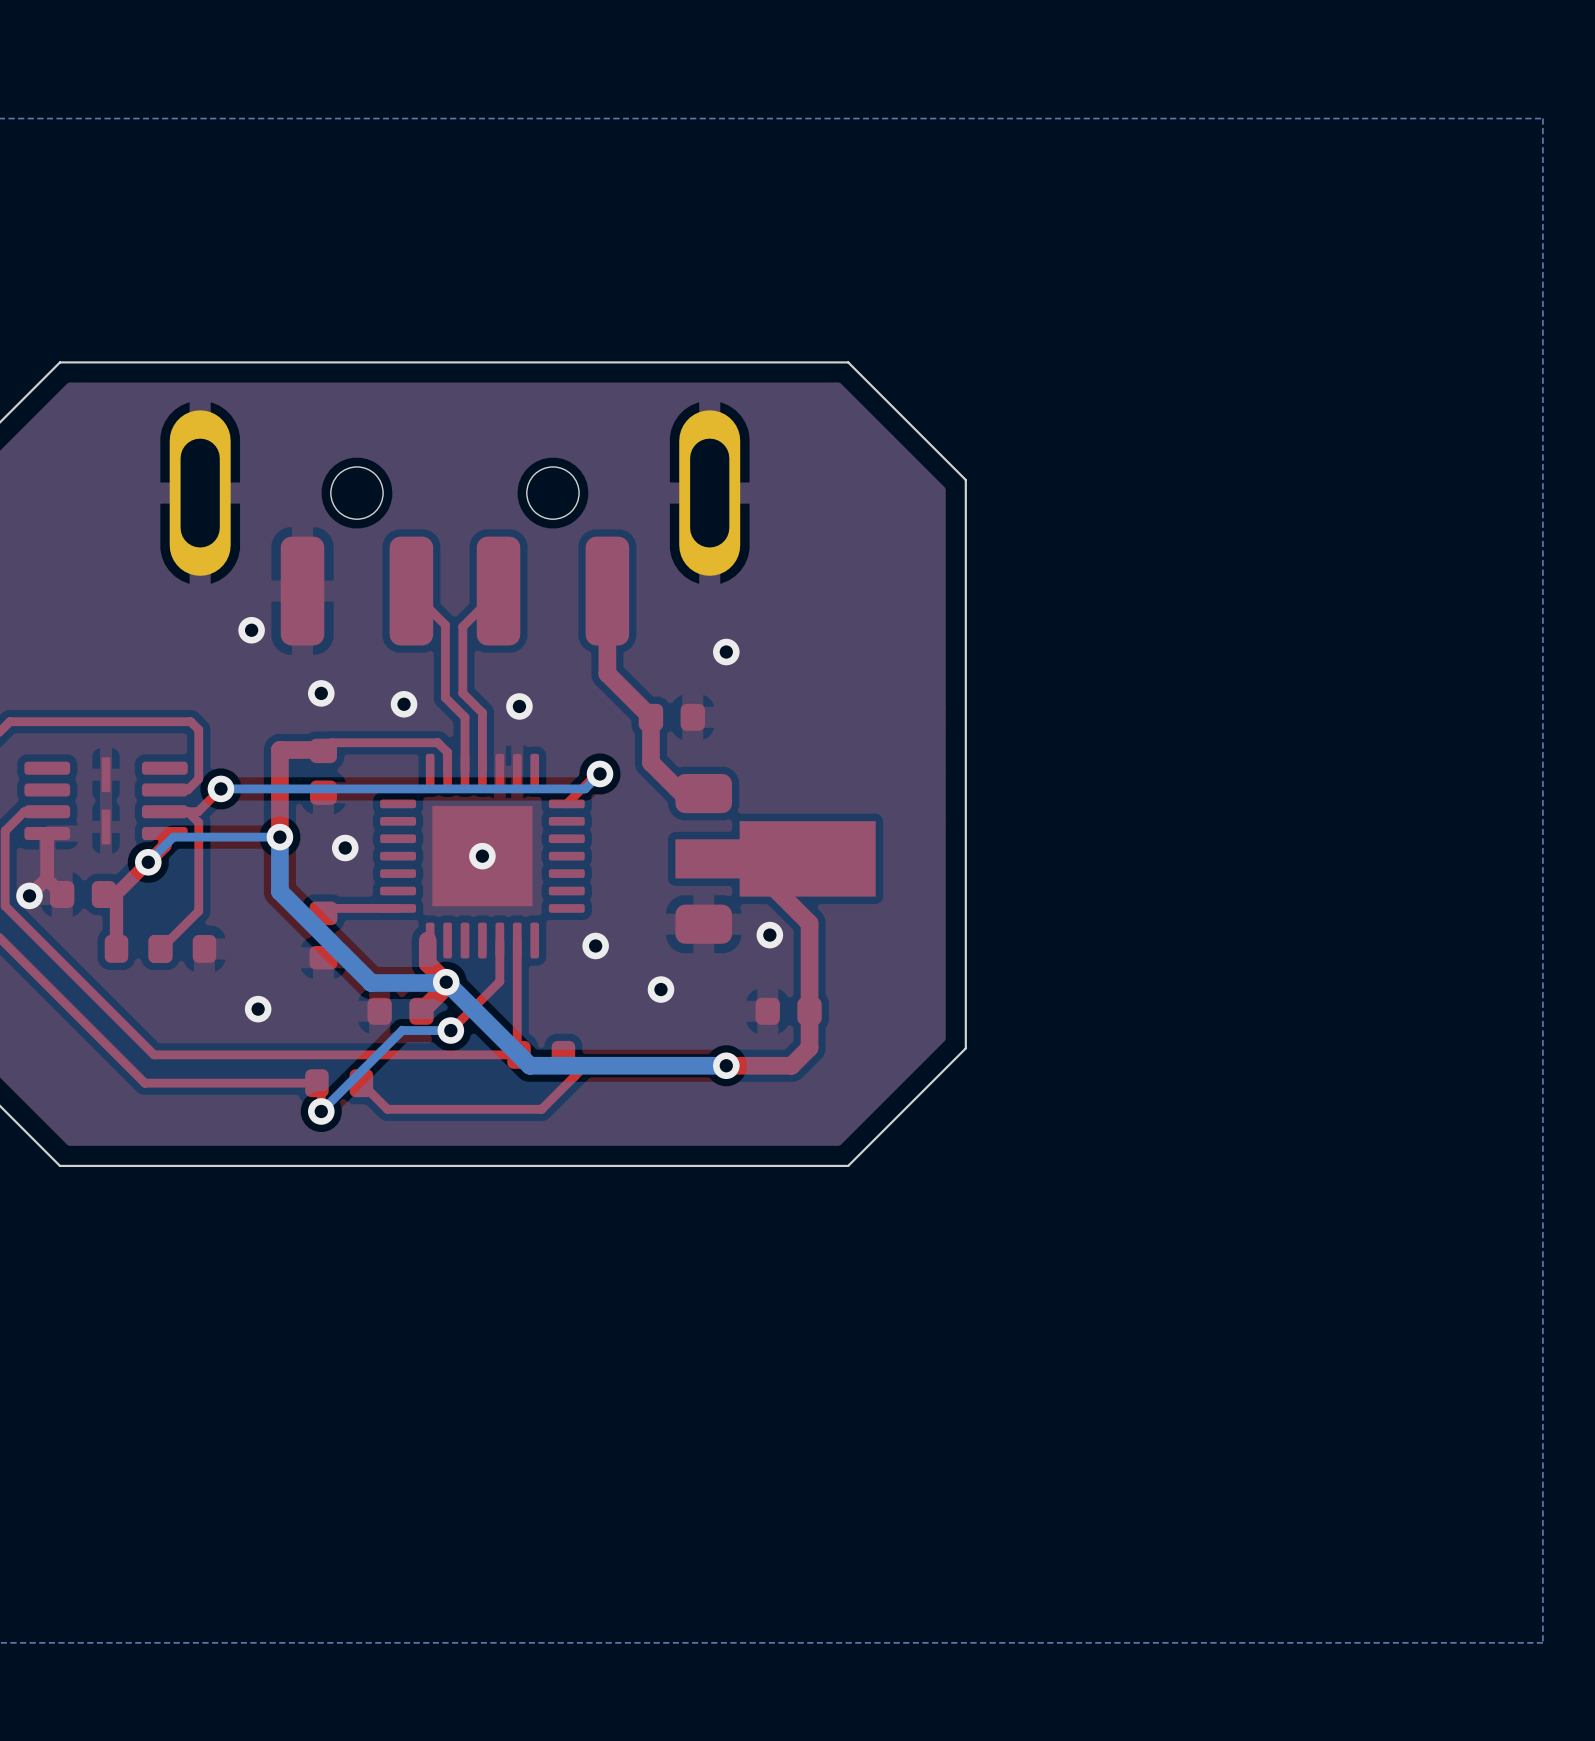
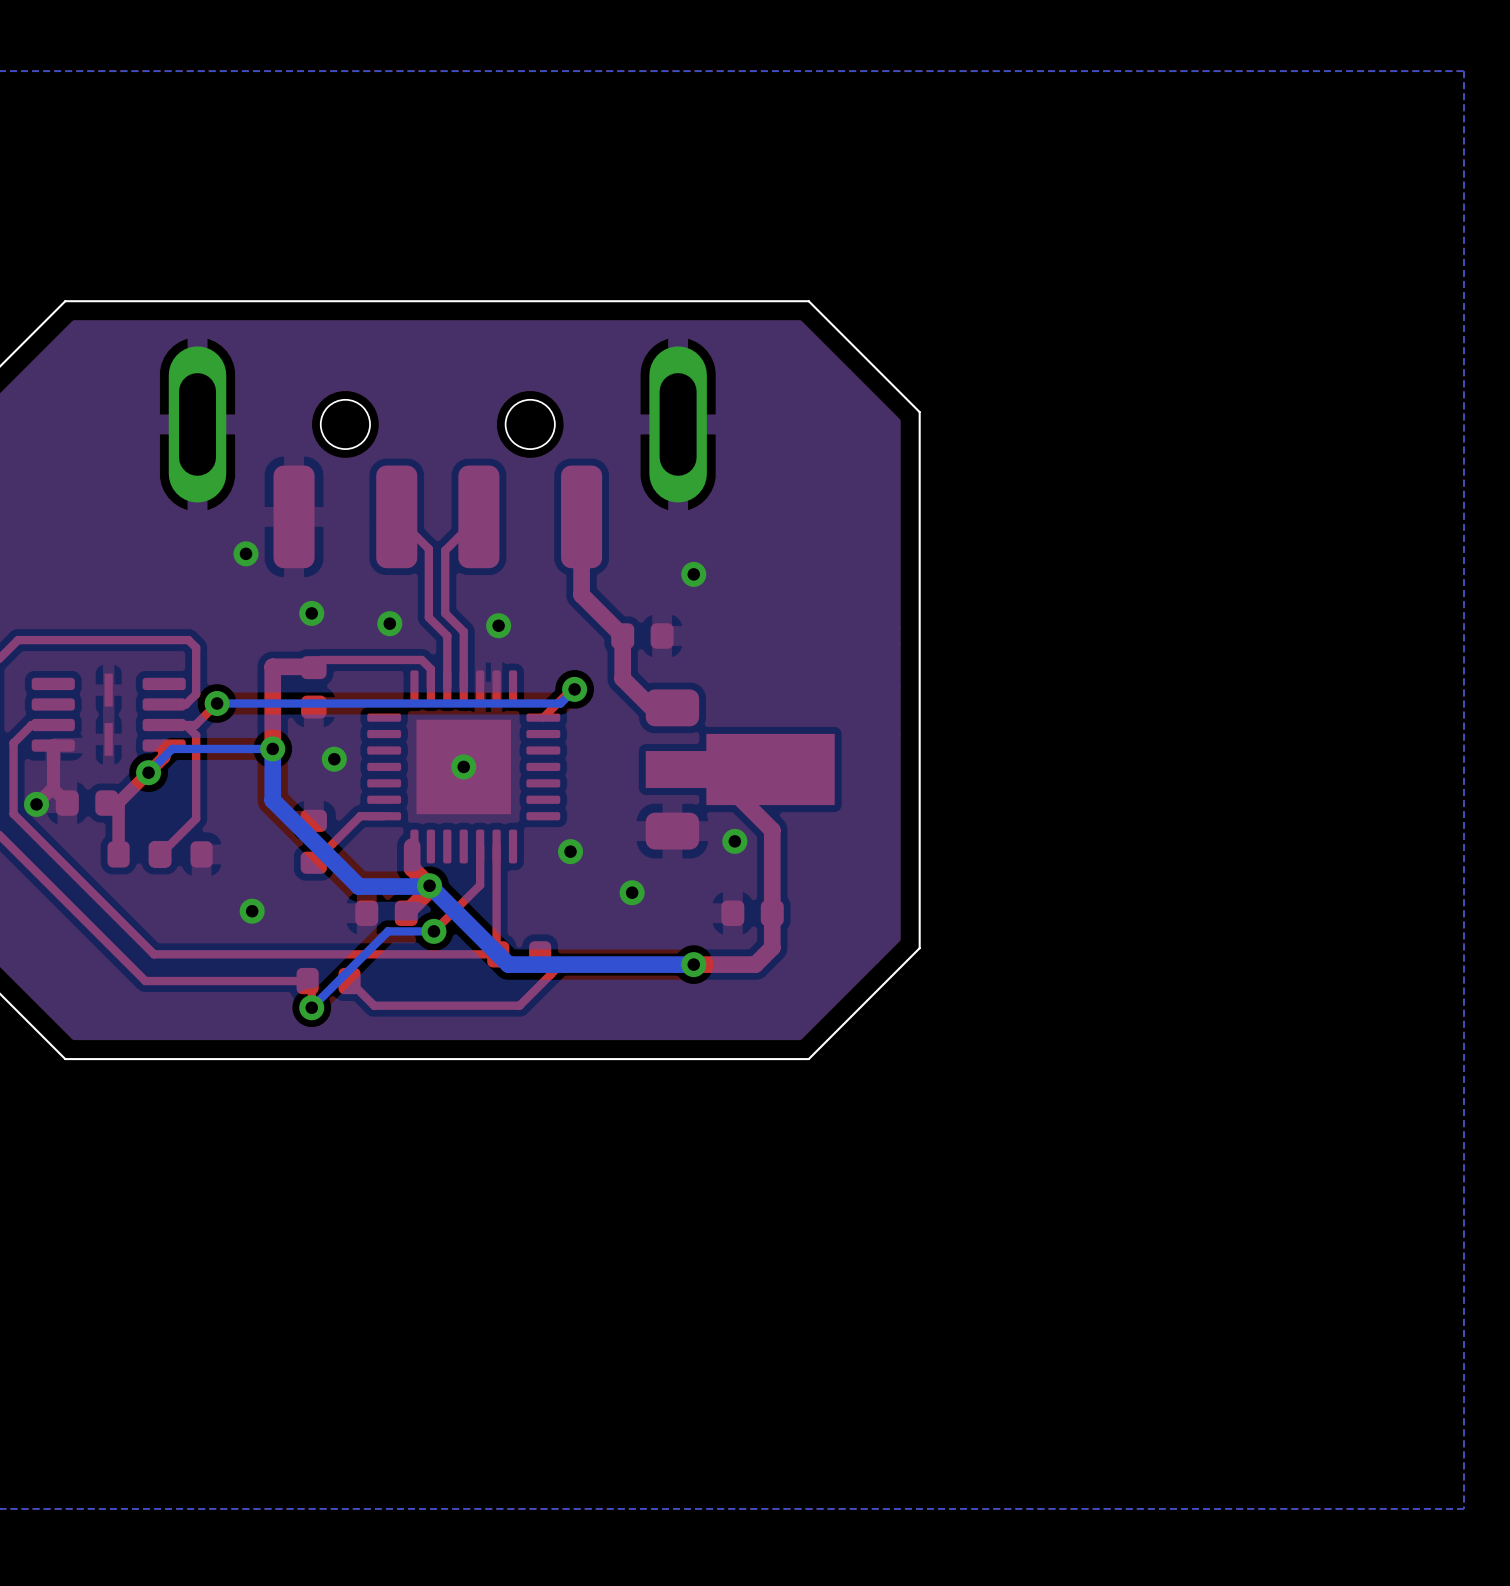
top track: (372, 908) (328, 908) (323, 913) -> (360, 816) (313, 862)

